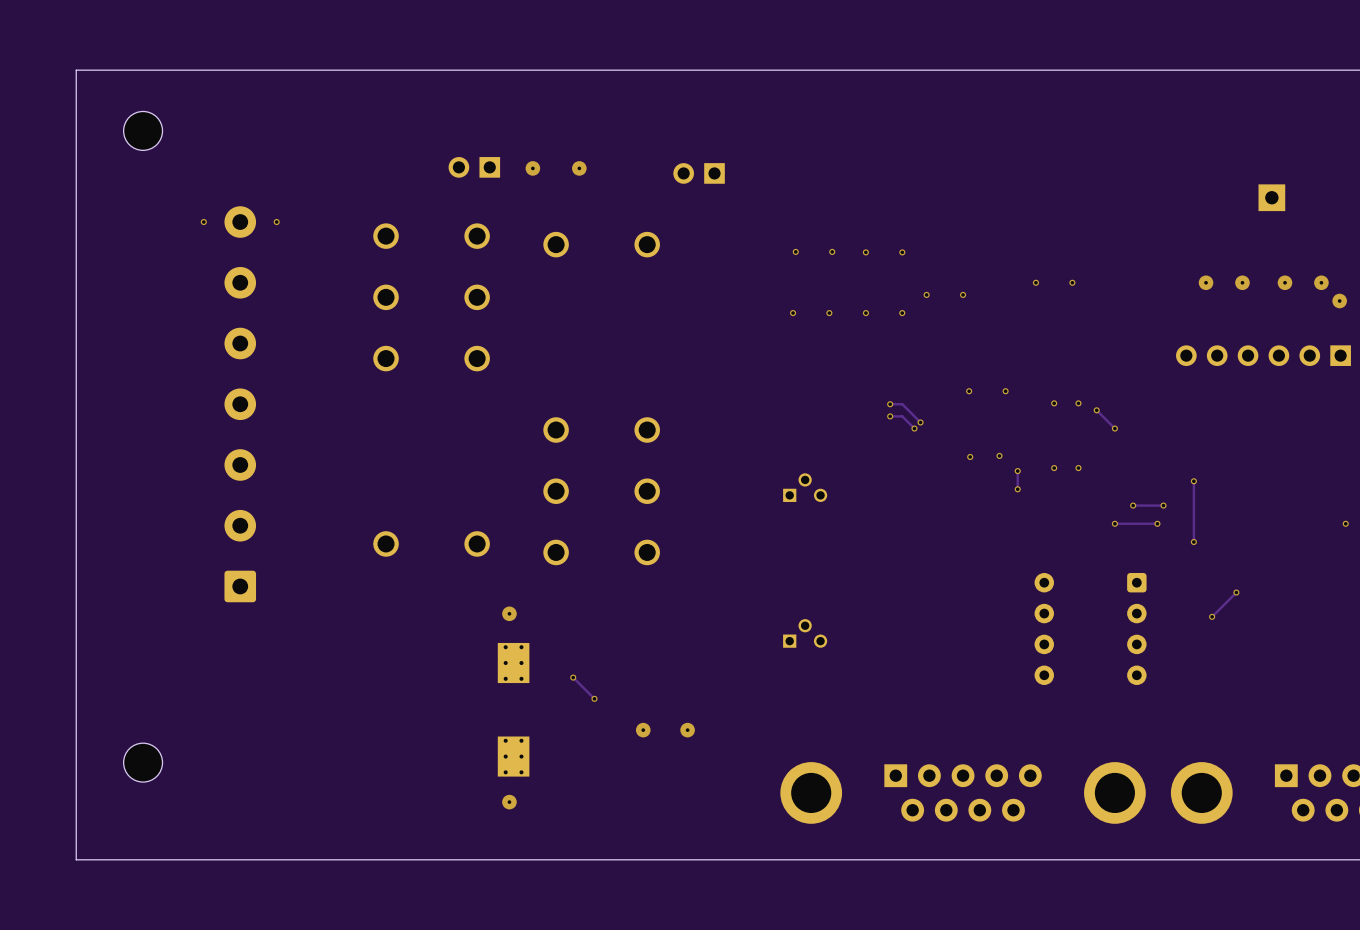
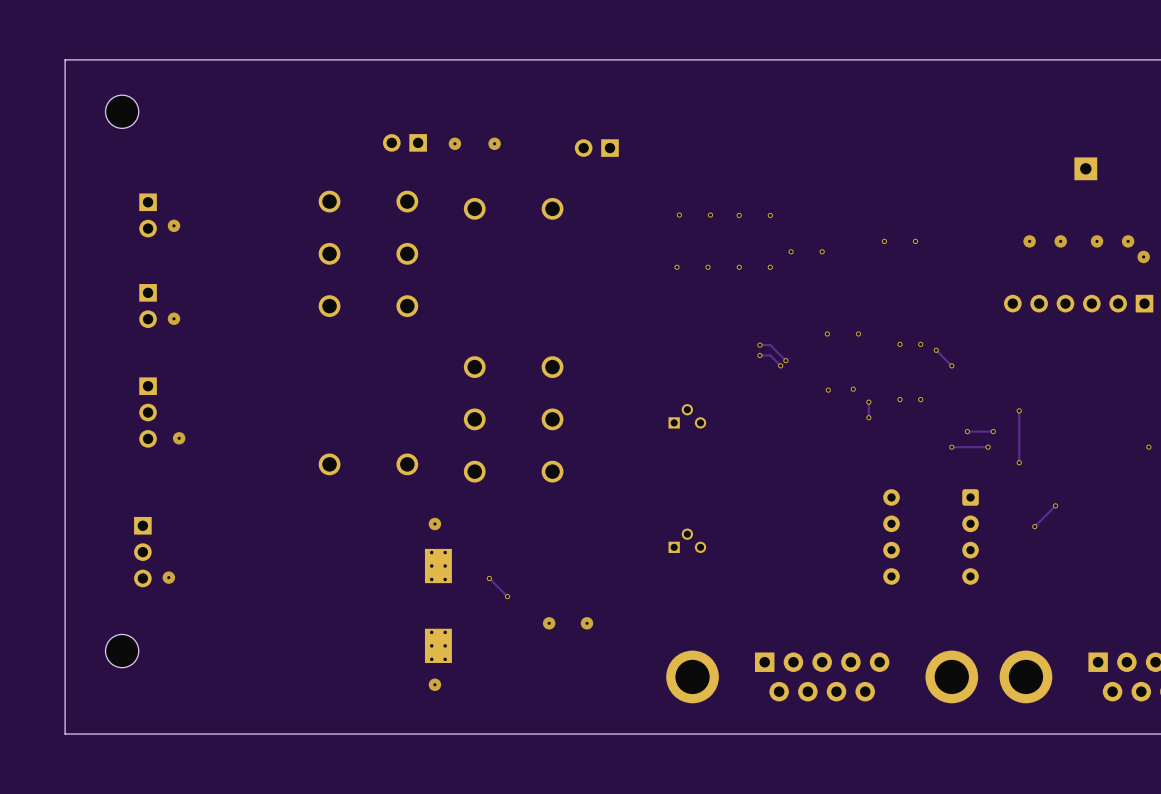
via: (203, 222) -> none
via: (276, 222) -> none
part: none -> (148, 215)
via: none -> (173, 225)
part: none -> (148, 306)
via: none -> (173, 318)
part: (240, 404) -> none
part: none -> (148, 412)
via: none -> (179, 438)
part: none -> (142, 552)
via: none -> (168, 577)

